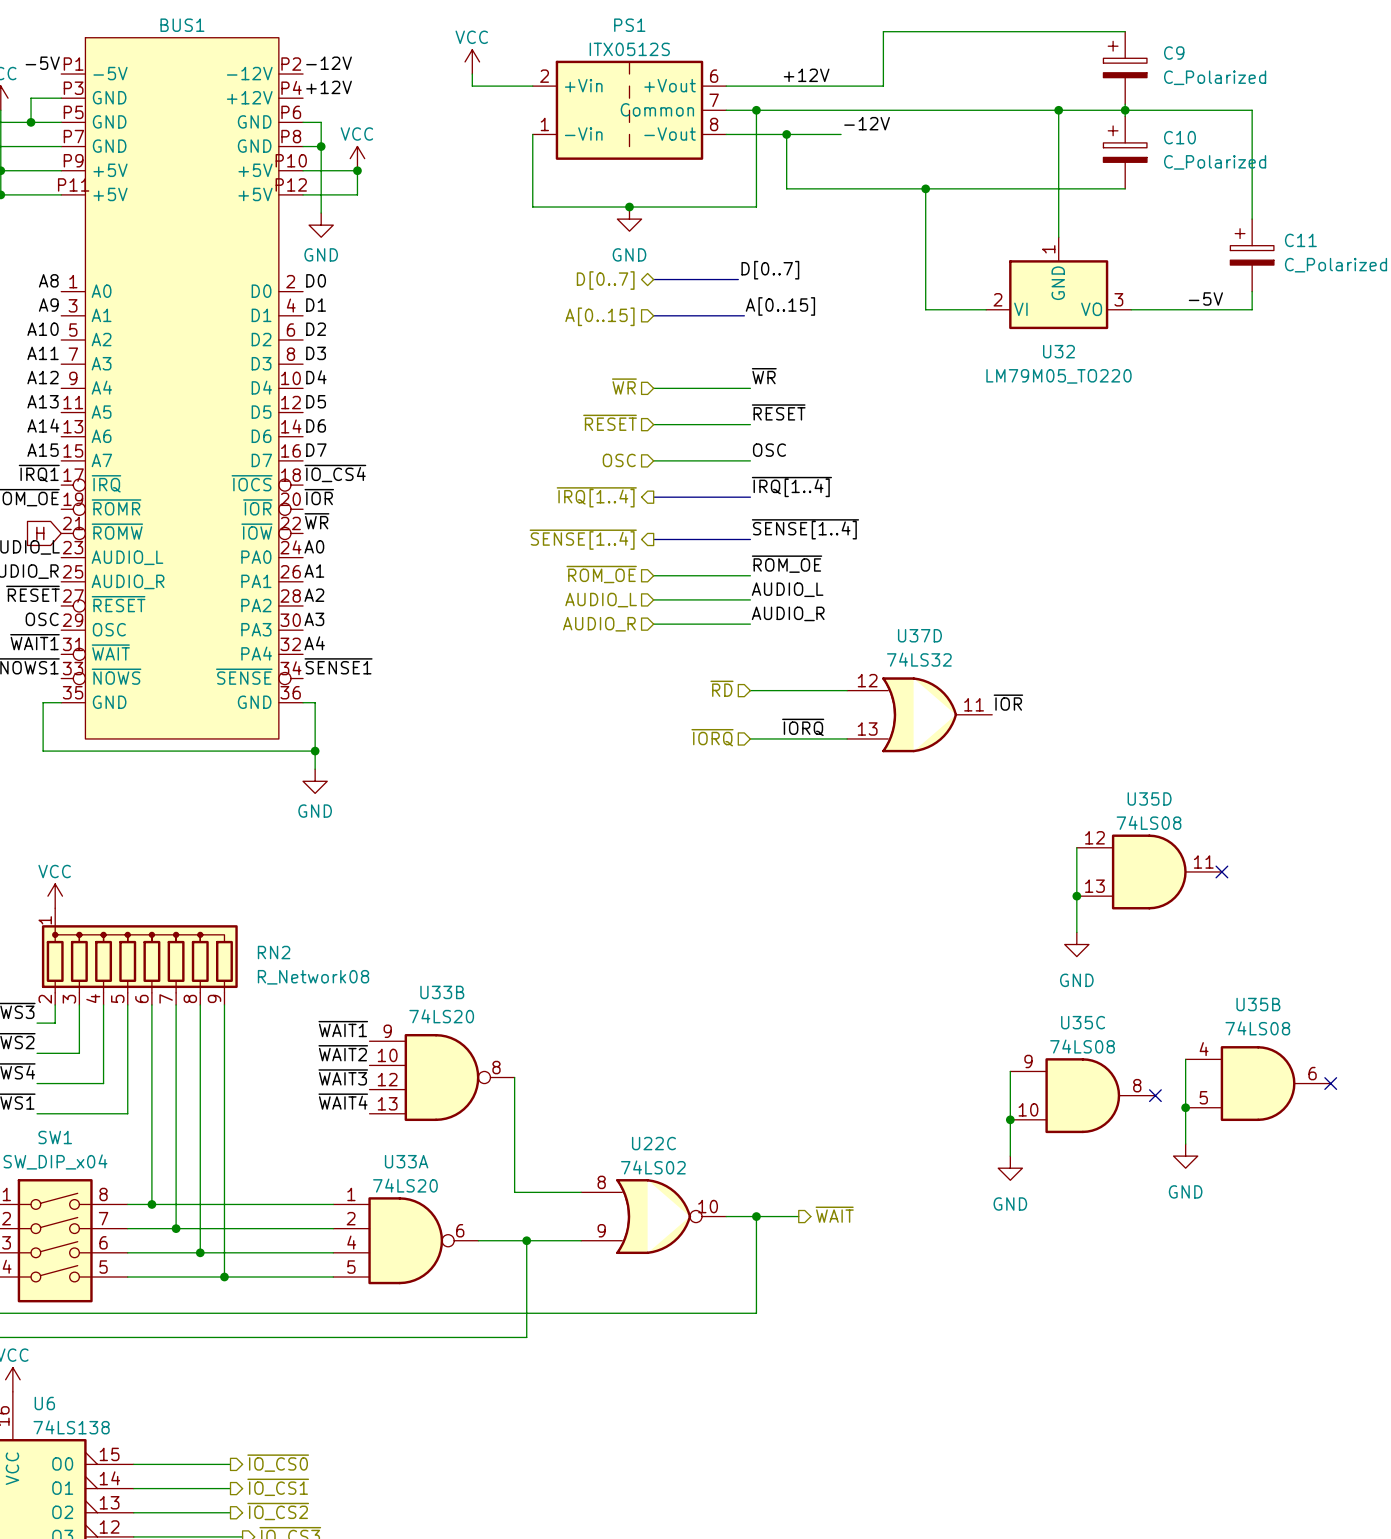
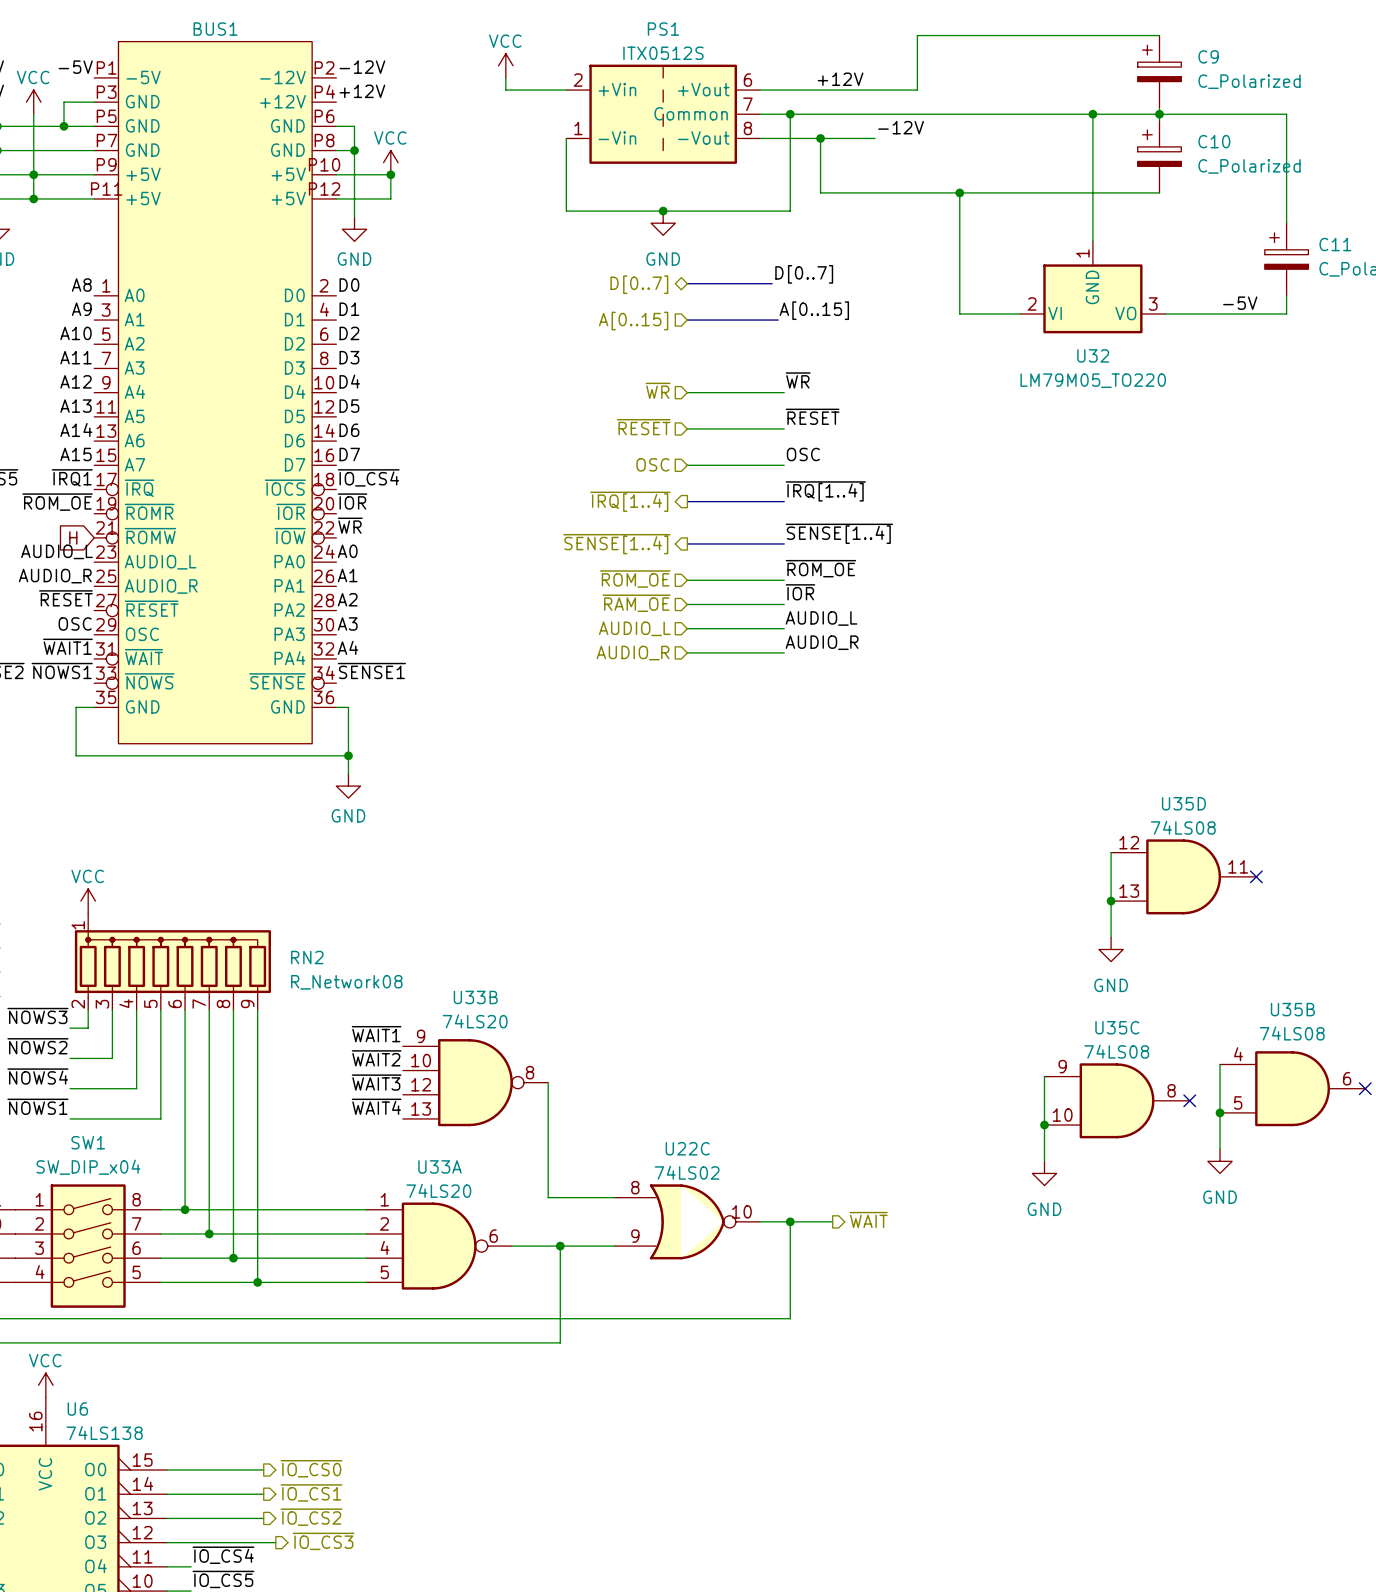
label: AUDIO_L (787, 589) -> ~{IOR} (800, 592)
hierarchical label: AUDIO_L (601, 600) -> ~{RAM_OE} (636, 603)
label: AUDIO_R (788, 613) -> AUDIO_L (821, 618)
hierarchical label: AUDIO_R (599, 624) -> AUDIO_L (634, 628)
label: none -> AUDIO_R (822, 642)
hierarchical label: none -> AUDIO_R (633, 653)
hierarchical label: ~{RD} (721, 688) -> none
wire: (750, 690) (847, 690) -> (687, 652) (784, 652)
label: ~{IOR} (1008, 702) -> none
U37D: 74LS32 (919, 714) -> none
label: ~{IORQ} (803, 727) -> none
hierarchical label: ~{IORQ} (712, 737) -> none
wire: (750, 738) (847, 738) -> none

